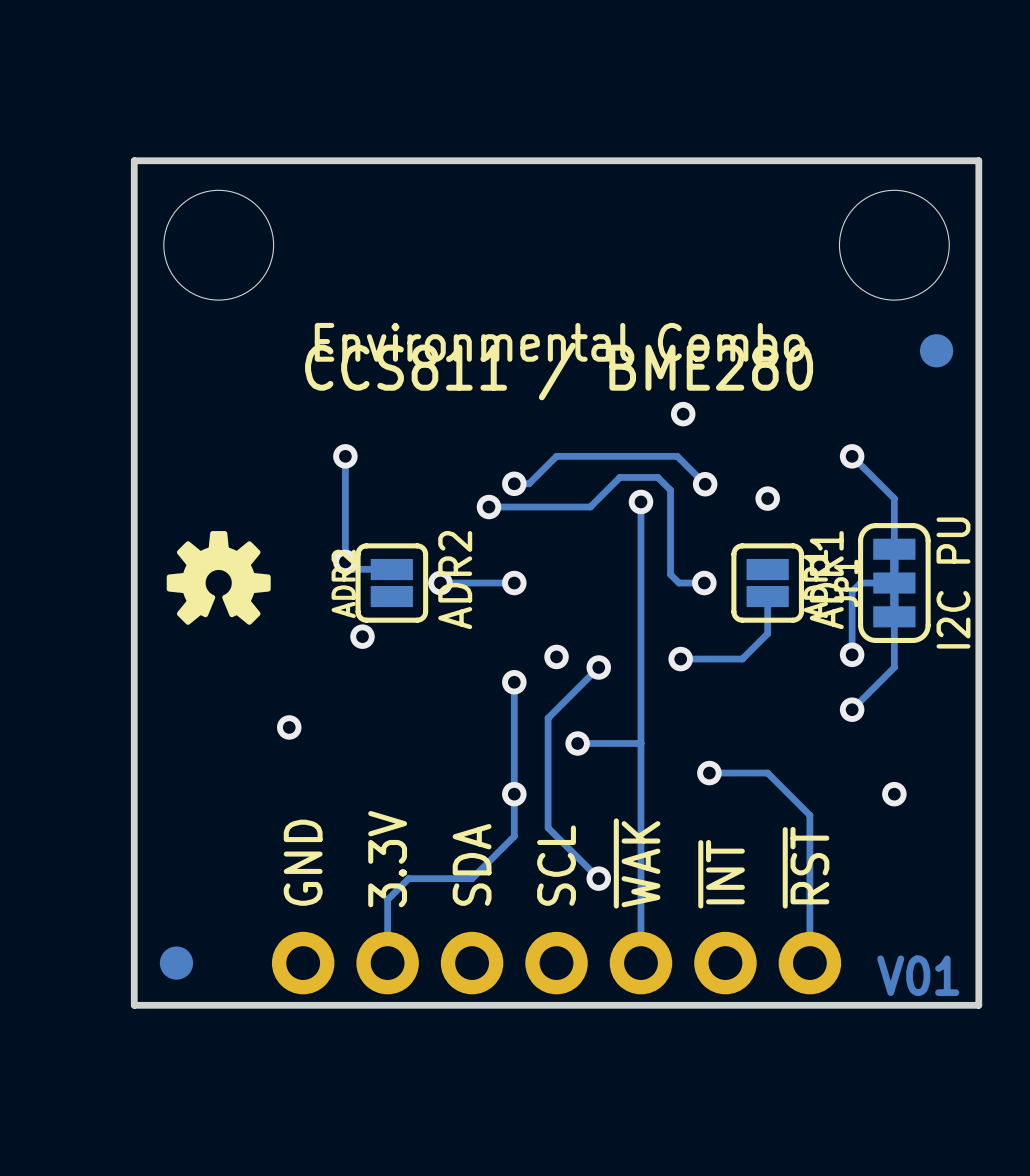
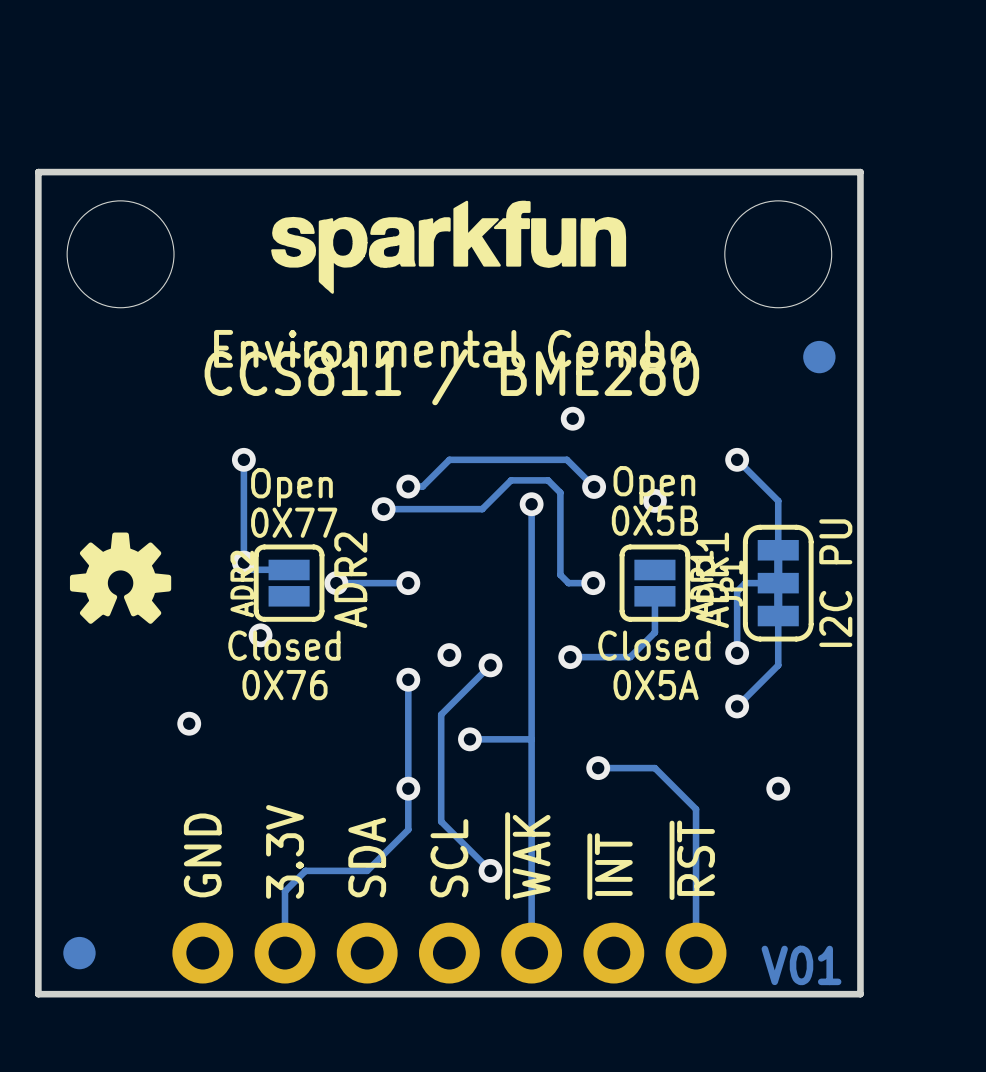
drawing: none -> [271, 200, 627, 294]
text: none -> Open (654, 485)
text: none -> Open (291, 487)
text: none -> 0X5B (654, 520)
text: none -> 0X77 (294, 522)
text: none -> Closed (284, 645)
text: none -> Closed (654, 645)
text: none -> 0X76 (284, 685)
text: none -> 0X5A (656, 685)

